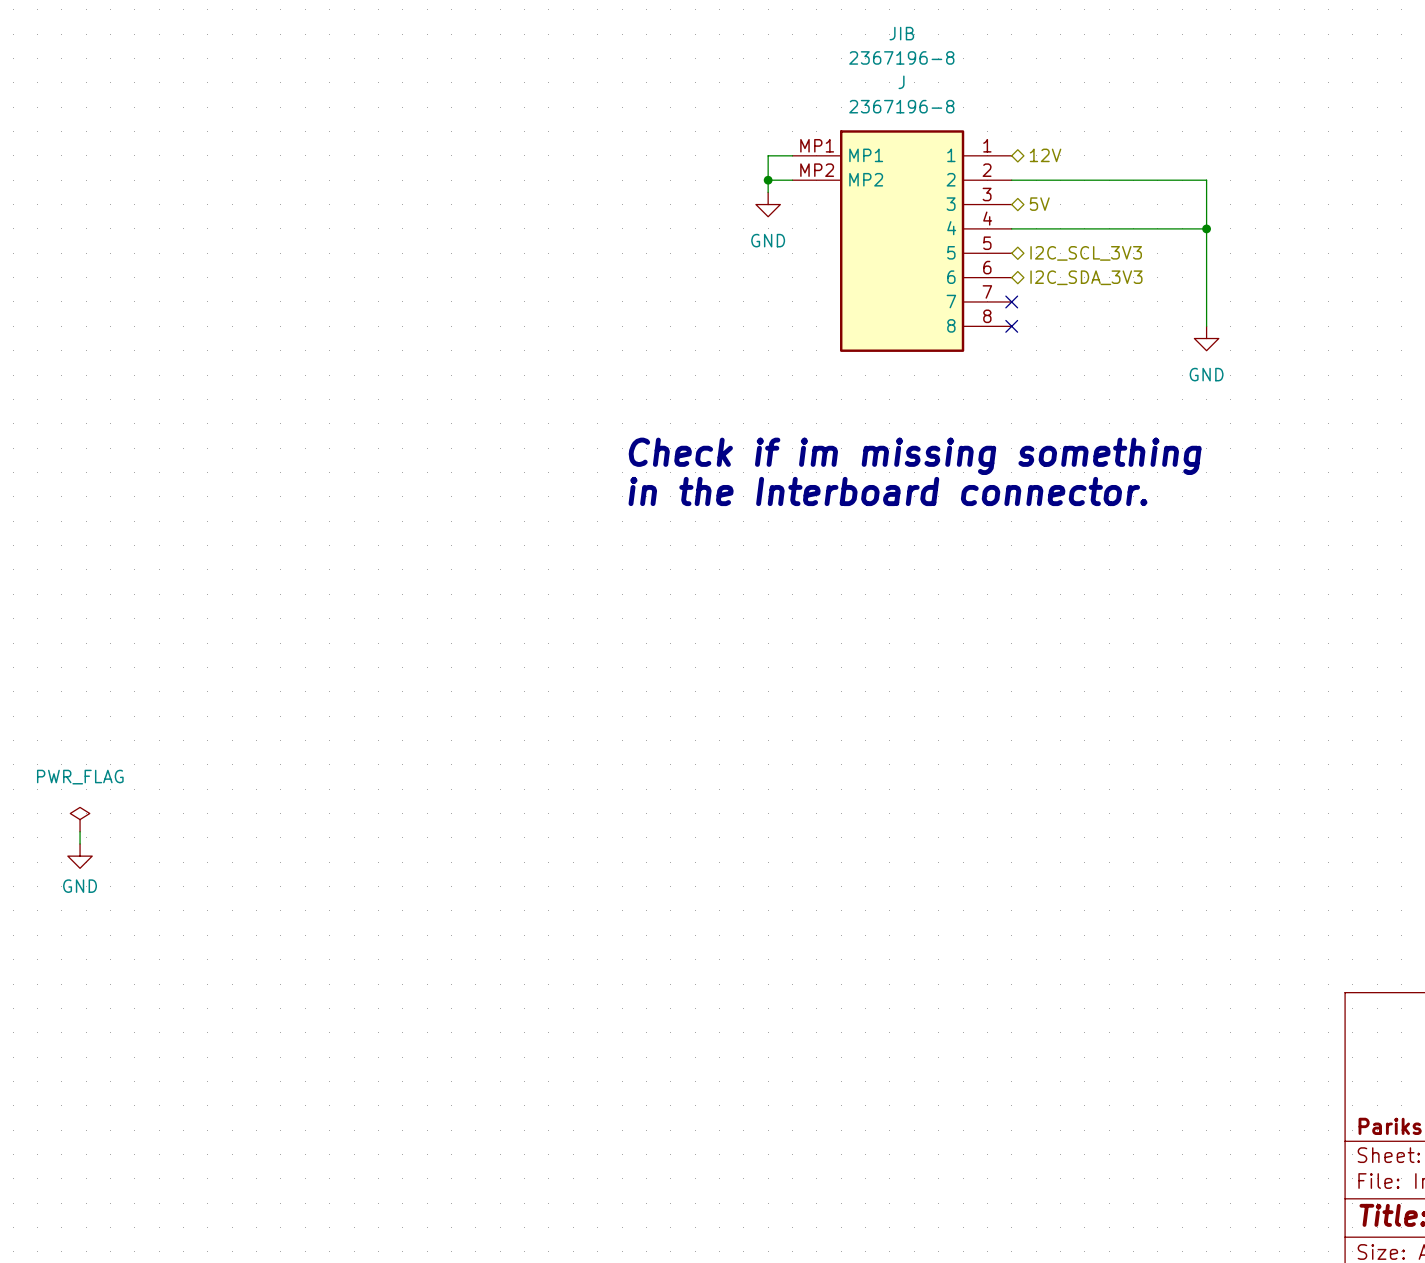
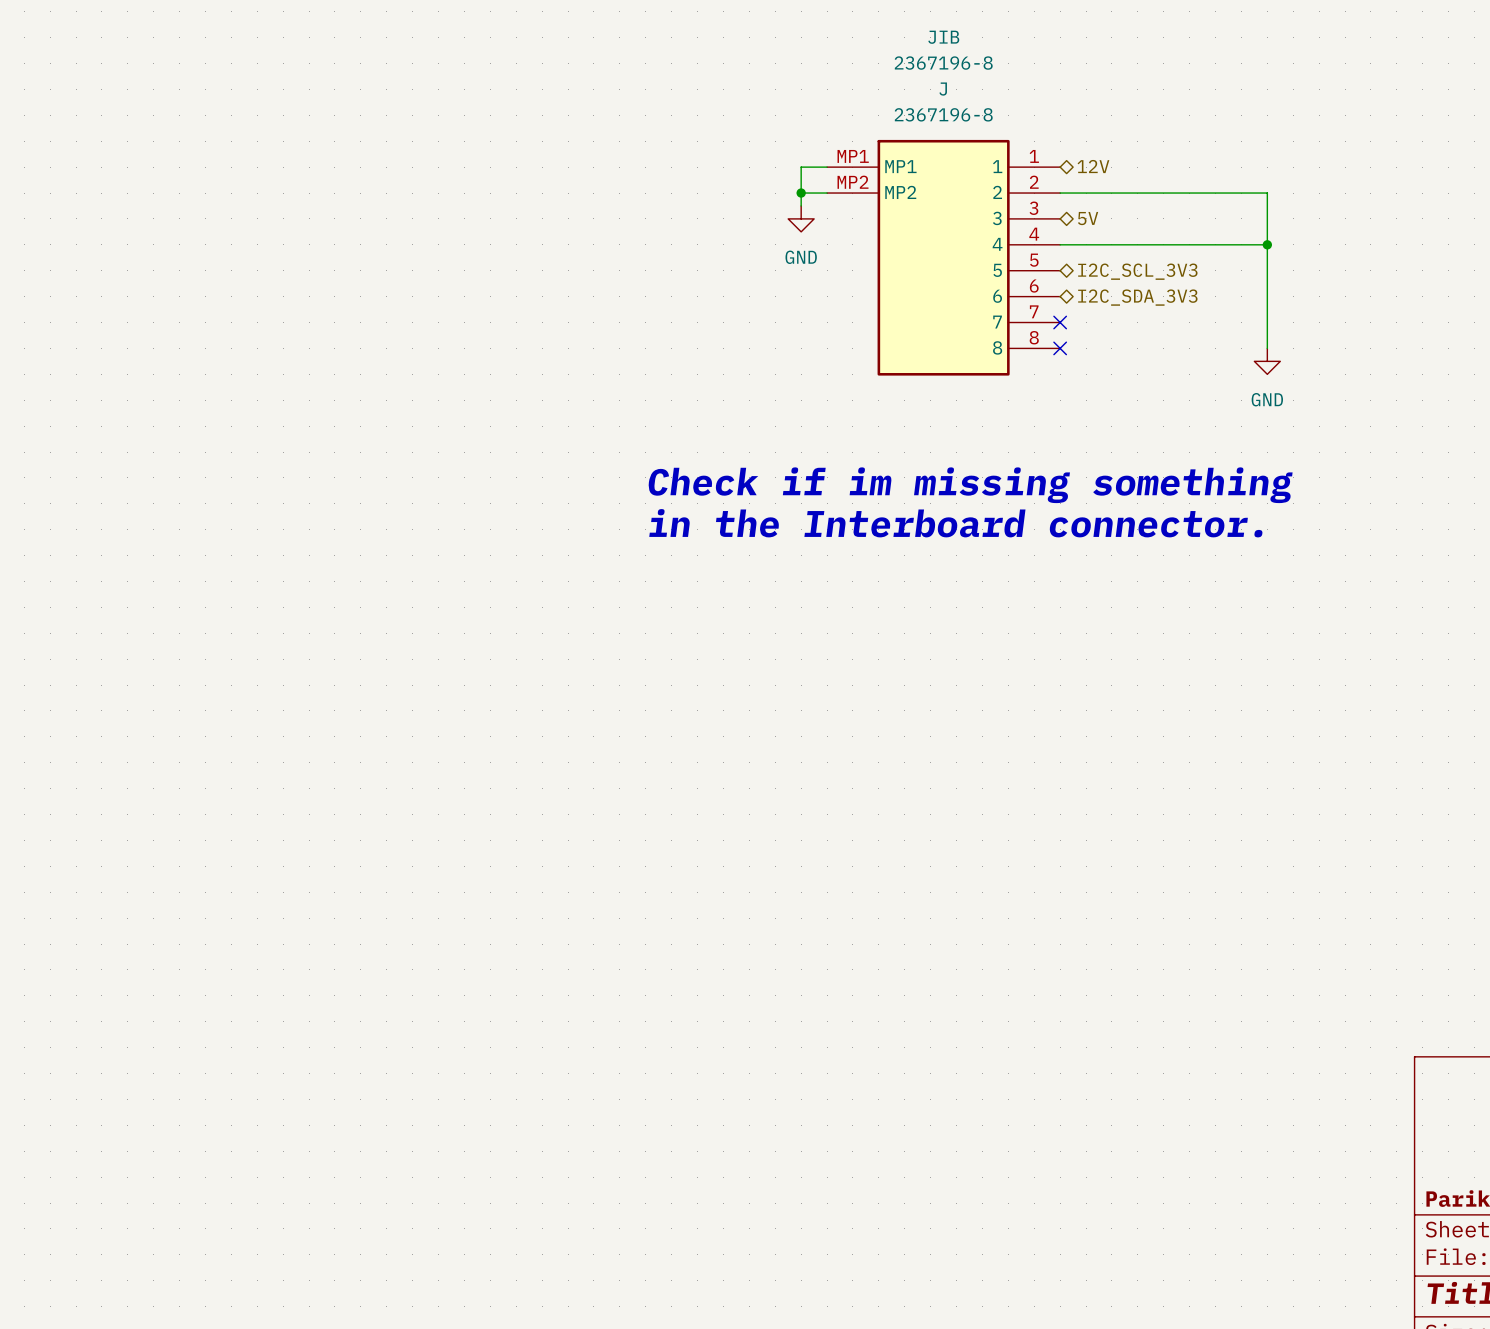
power symbol: PWR_FLAG (80, 819) -> none
wire: (80, 831) (80, 843) -> none
power symbol: GND (80, 856) -> none

